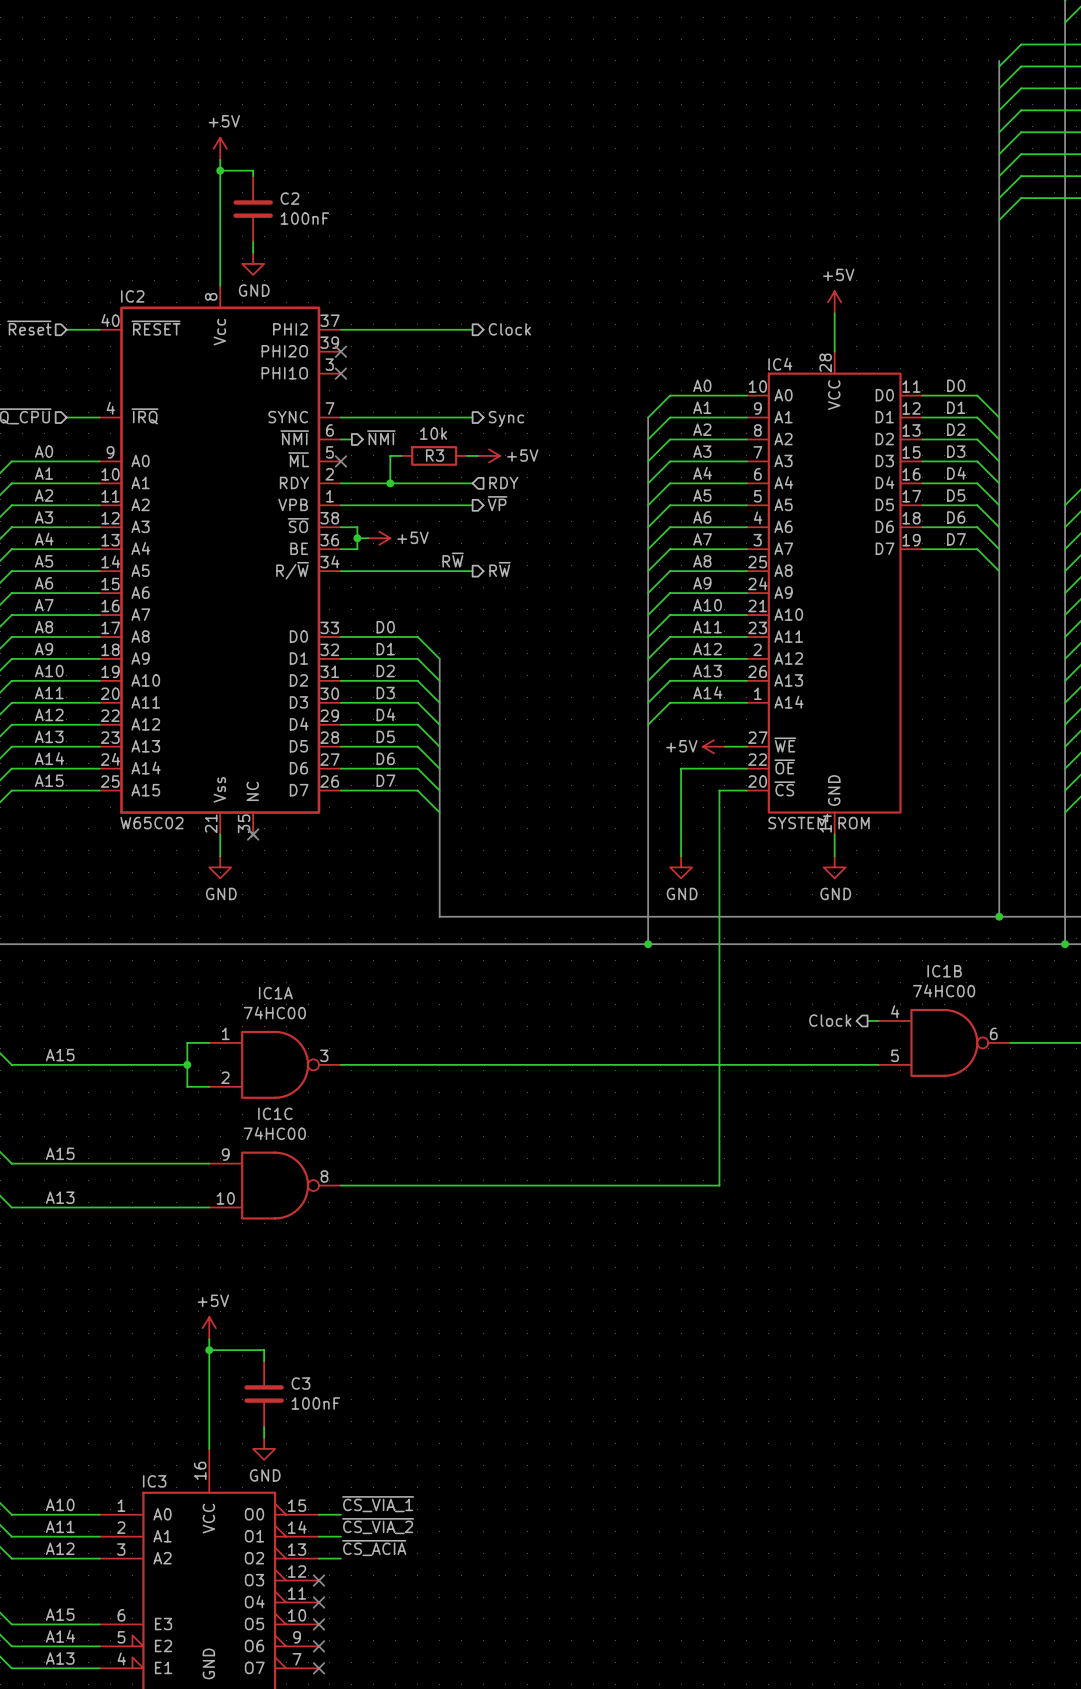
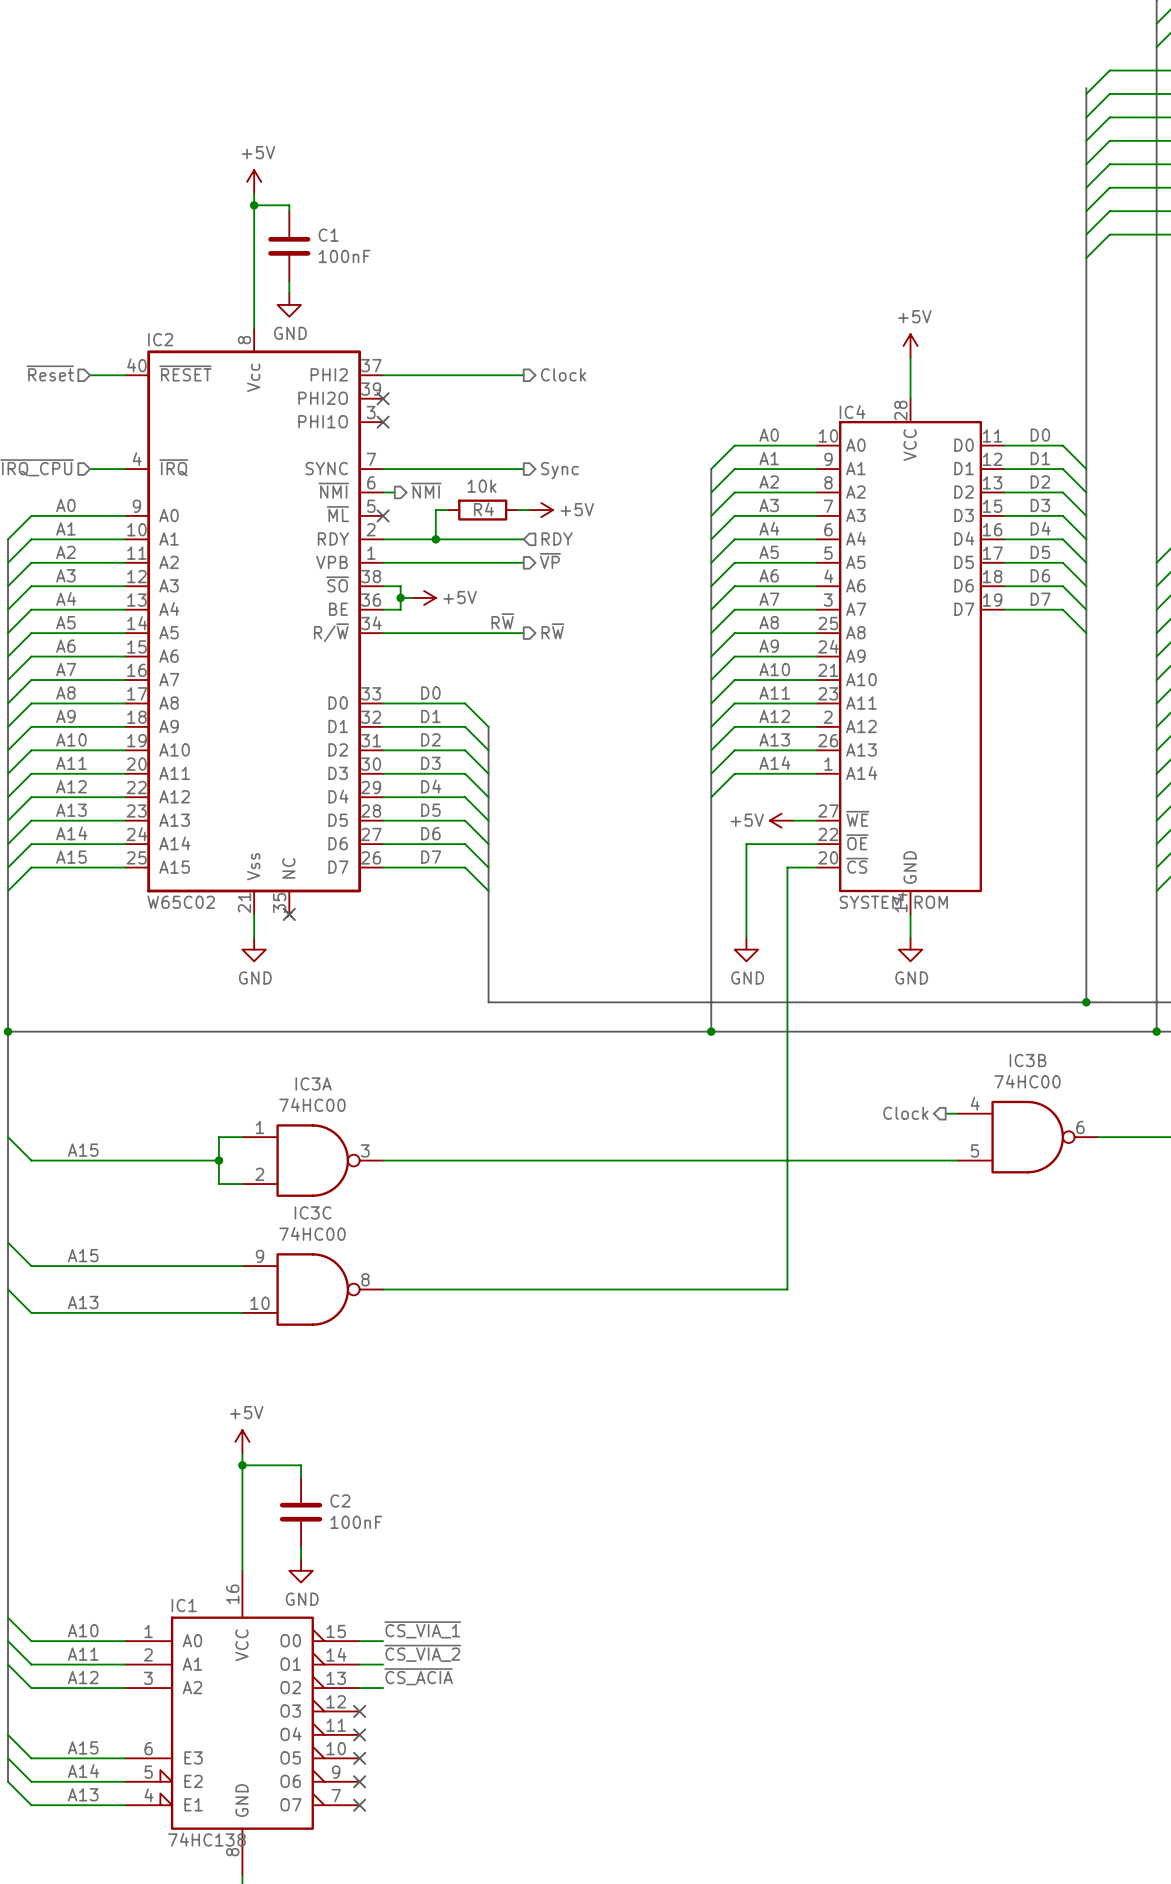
C2 name: C2 (289, 198) -> C1 (328, 235)
R3 name: R3 (435, 455) -> R4 (483, 509)
IC1B name: IC1B (944, 971) -> IC3B (1028, 1060)
IC1A name: IC1A (275, 993) -> IC3A (313, 1083)
IC1C name: IC1C (275, 1113) -> IC3C (313, 1212)
C3 name: C3 (300, 1383) -> C2 (340, 1500)
IC3 name: IC3 (154, 1481) -> IC1 (184, 1605)

